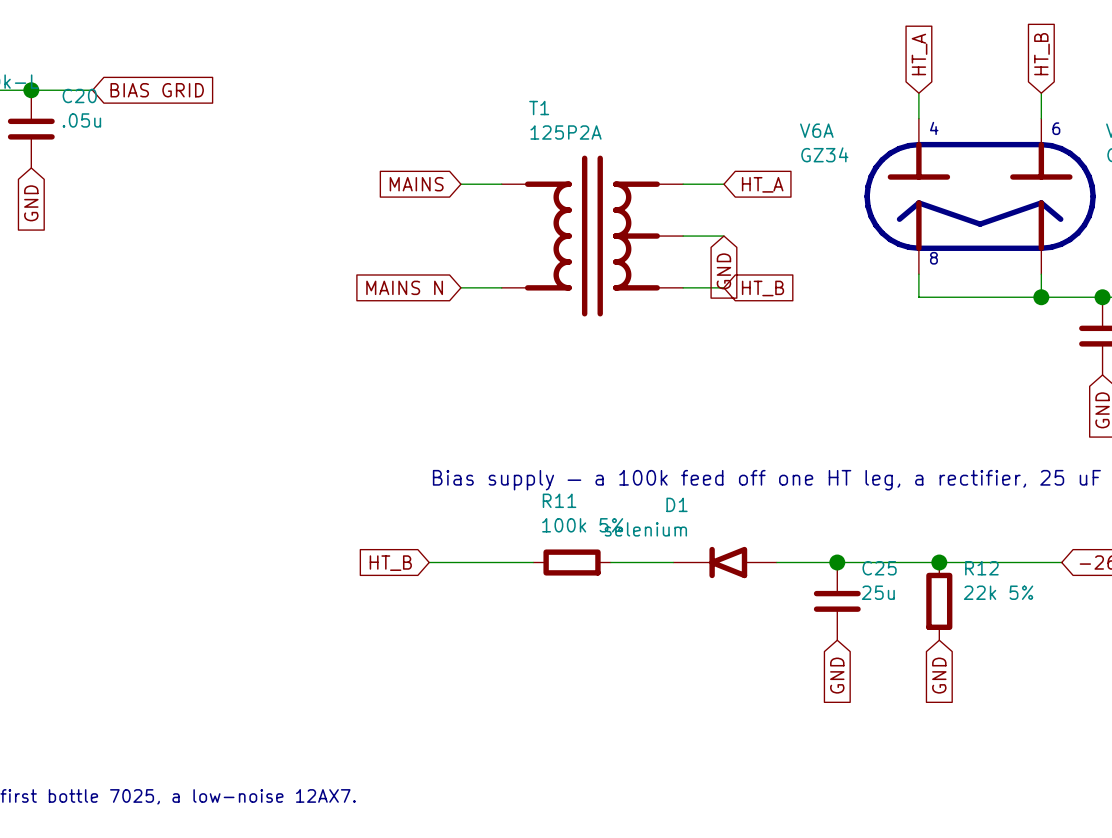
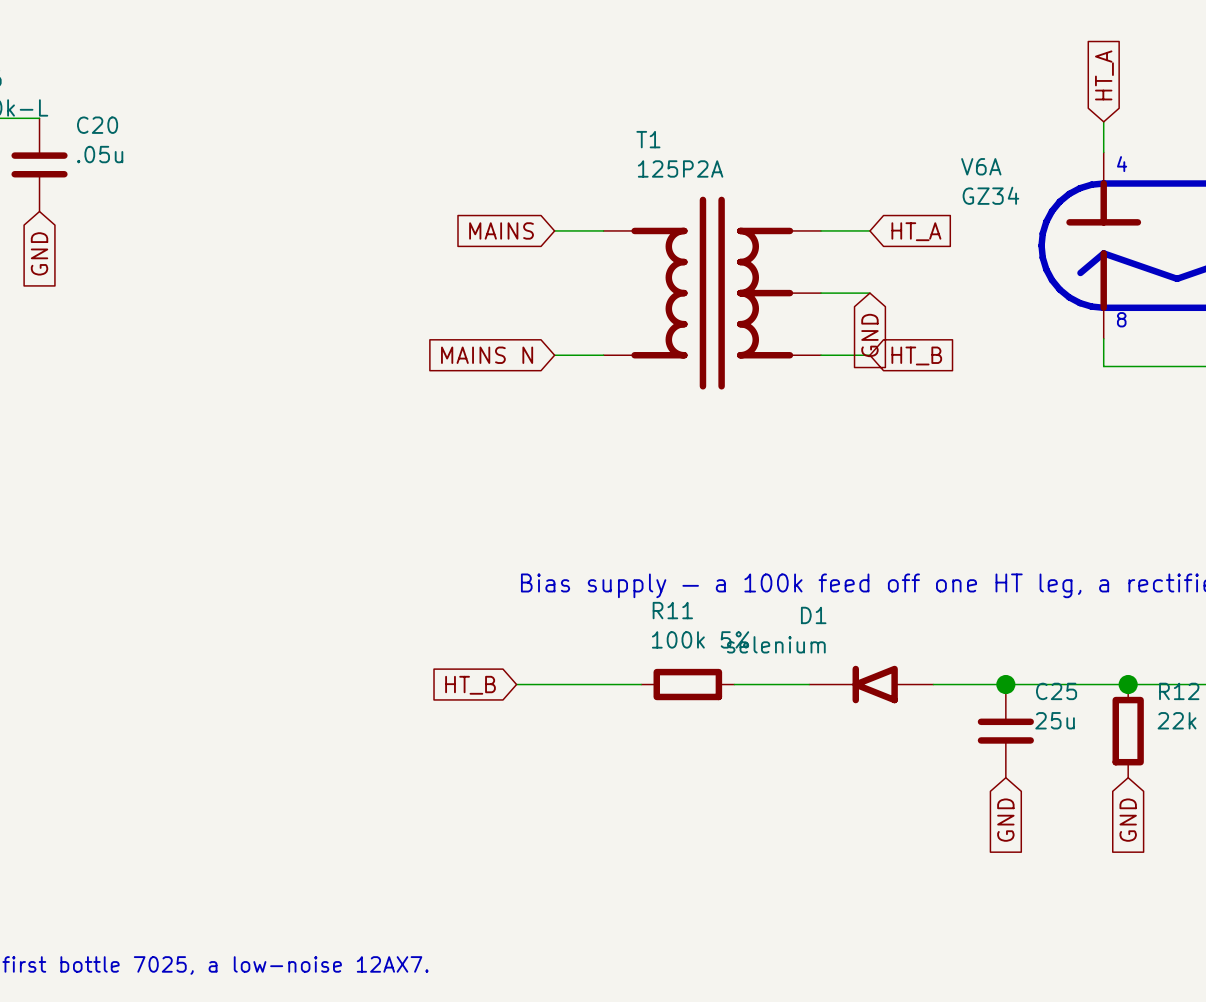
wire: (31, 90) (92, 90) -> none
junction: (31, 90) -> none
global label: BIAS GRID (157, 90) -> none

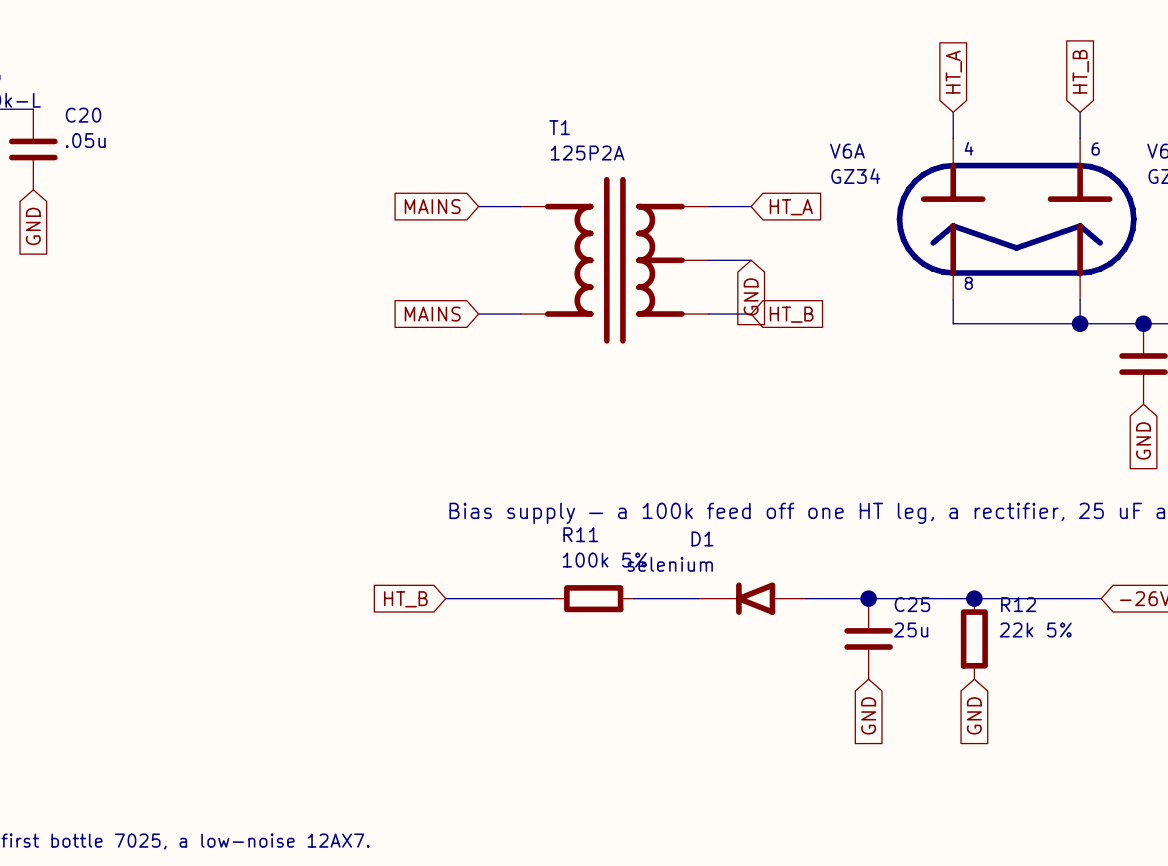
global label: MAINS N (487, 355) -> MAINS (432, 314)

